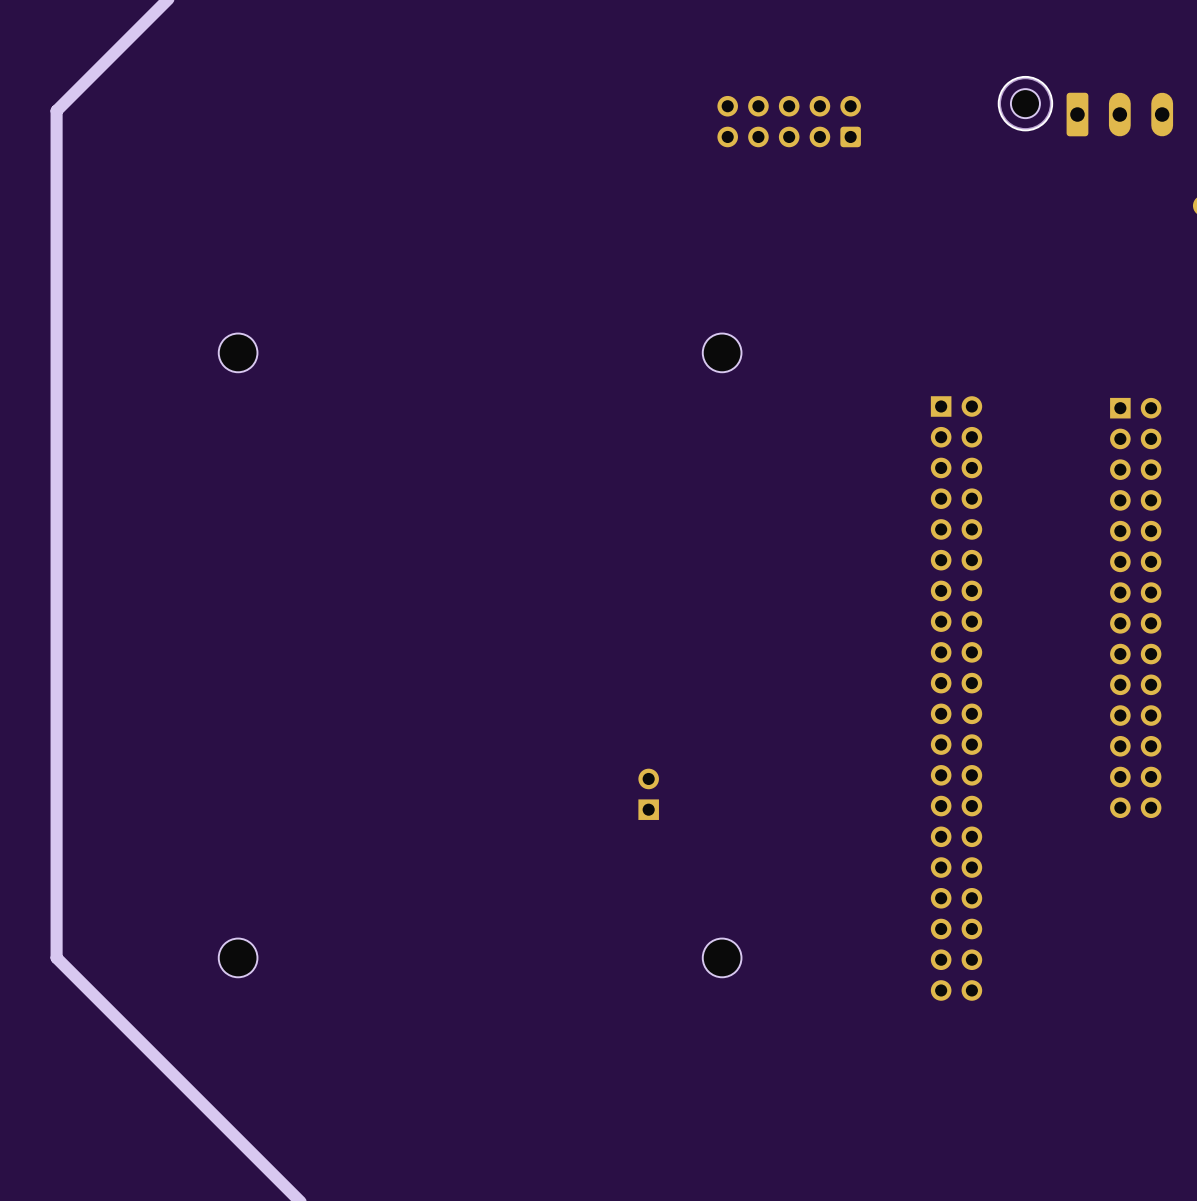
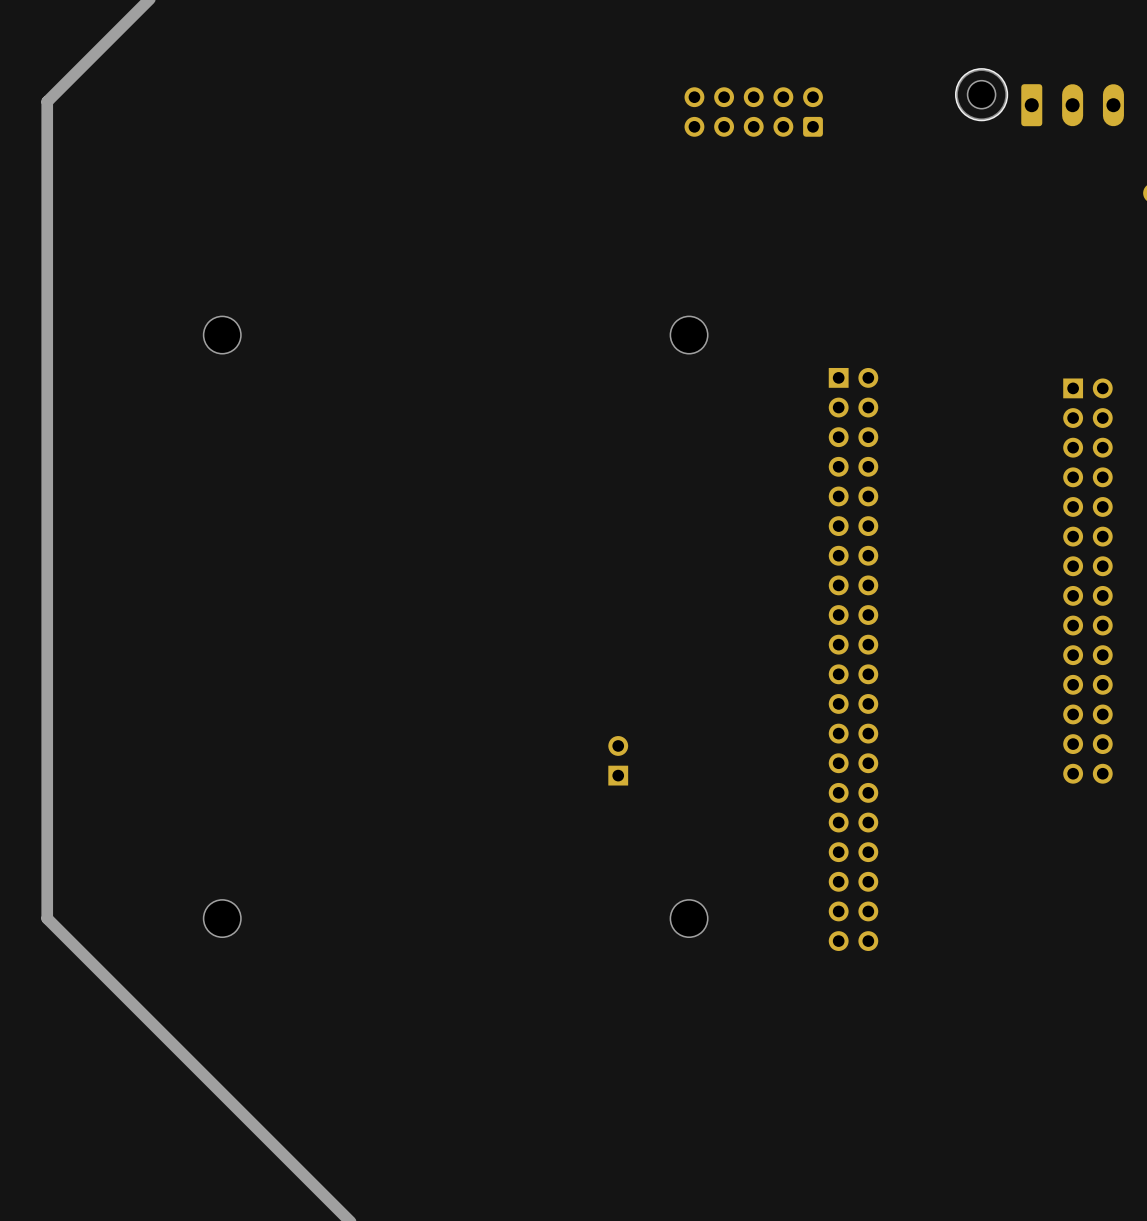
part position: (956, 698) -> (853, 659)

